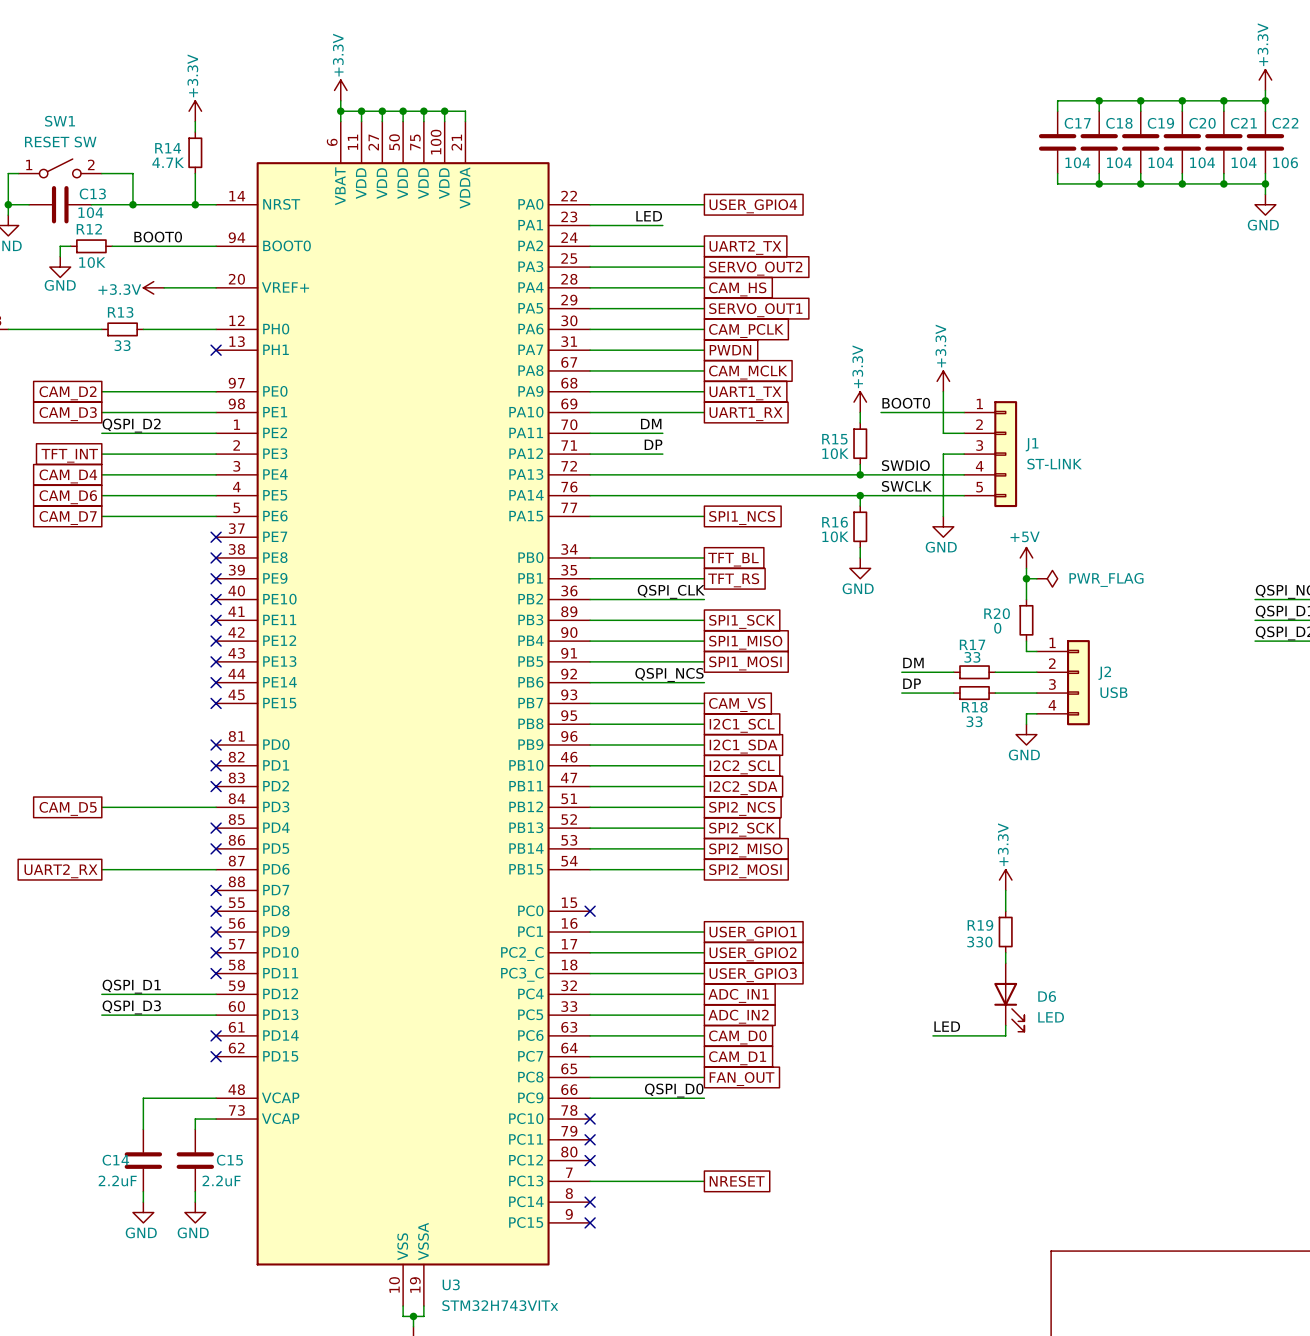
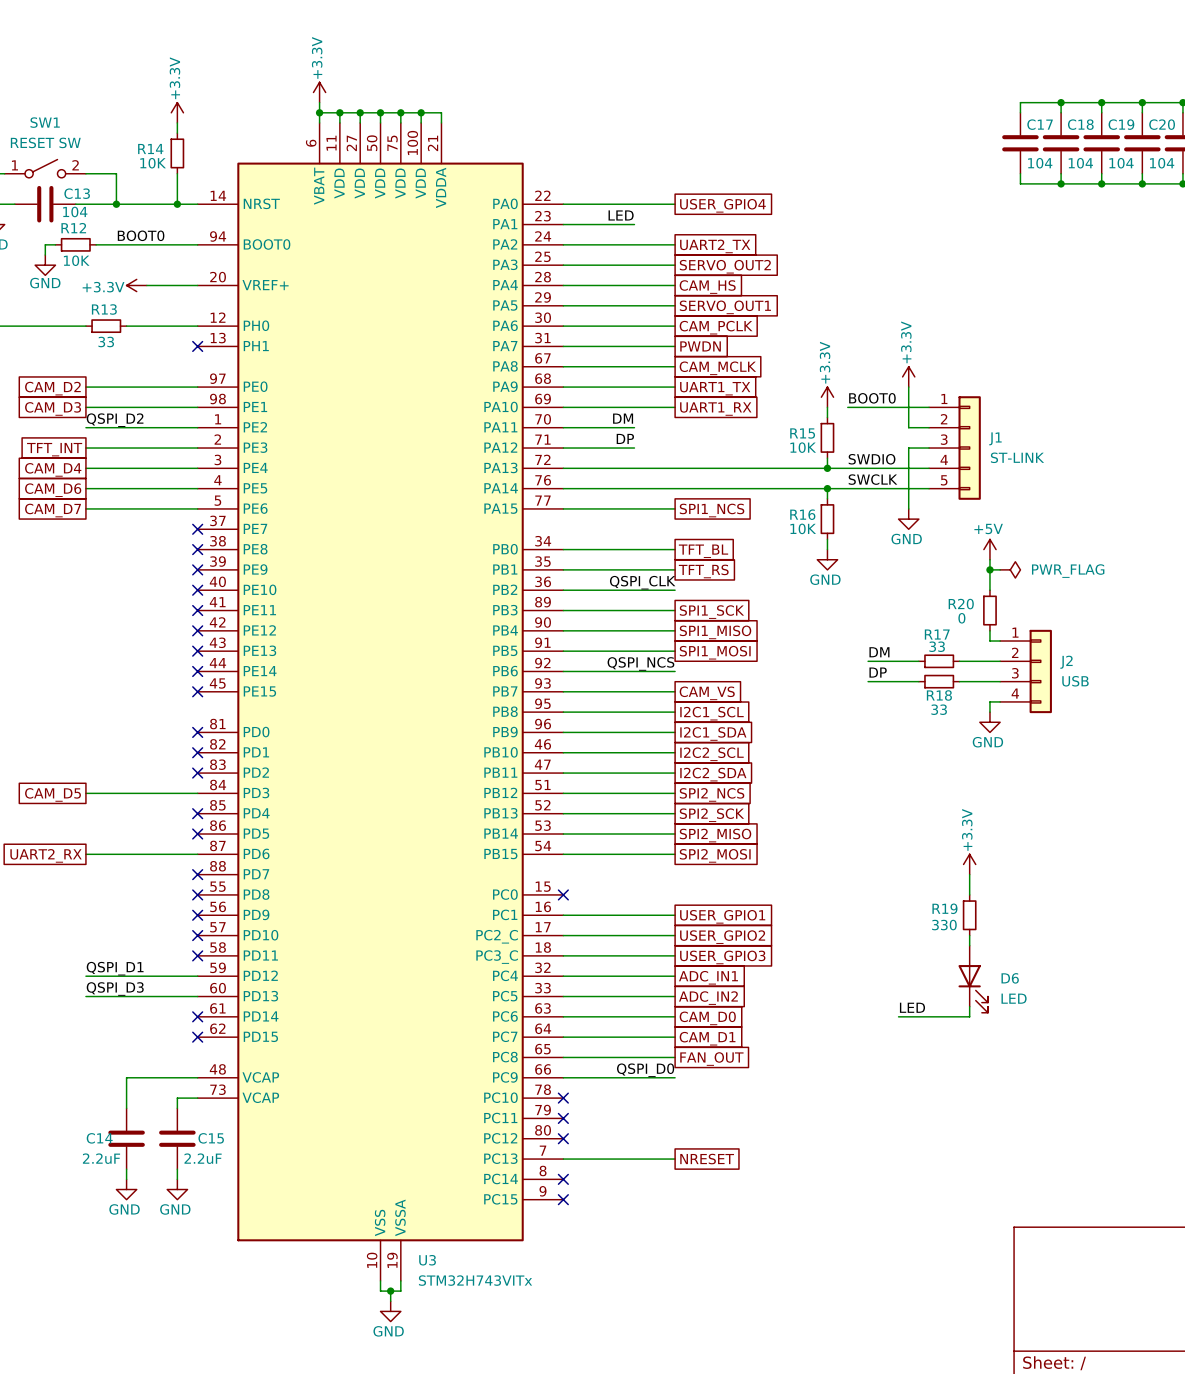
R14 value: 4.7K (168, 162) -> 10K (153, 163)

